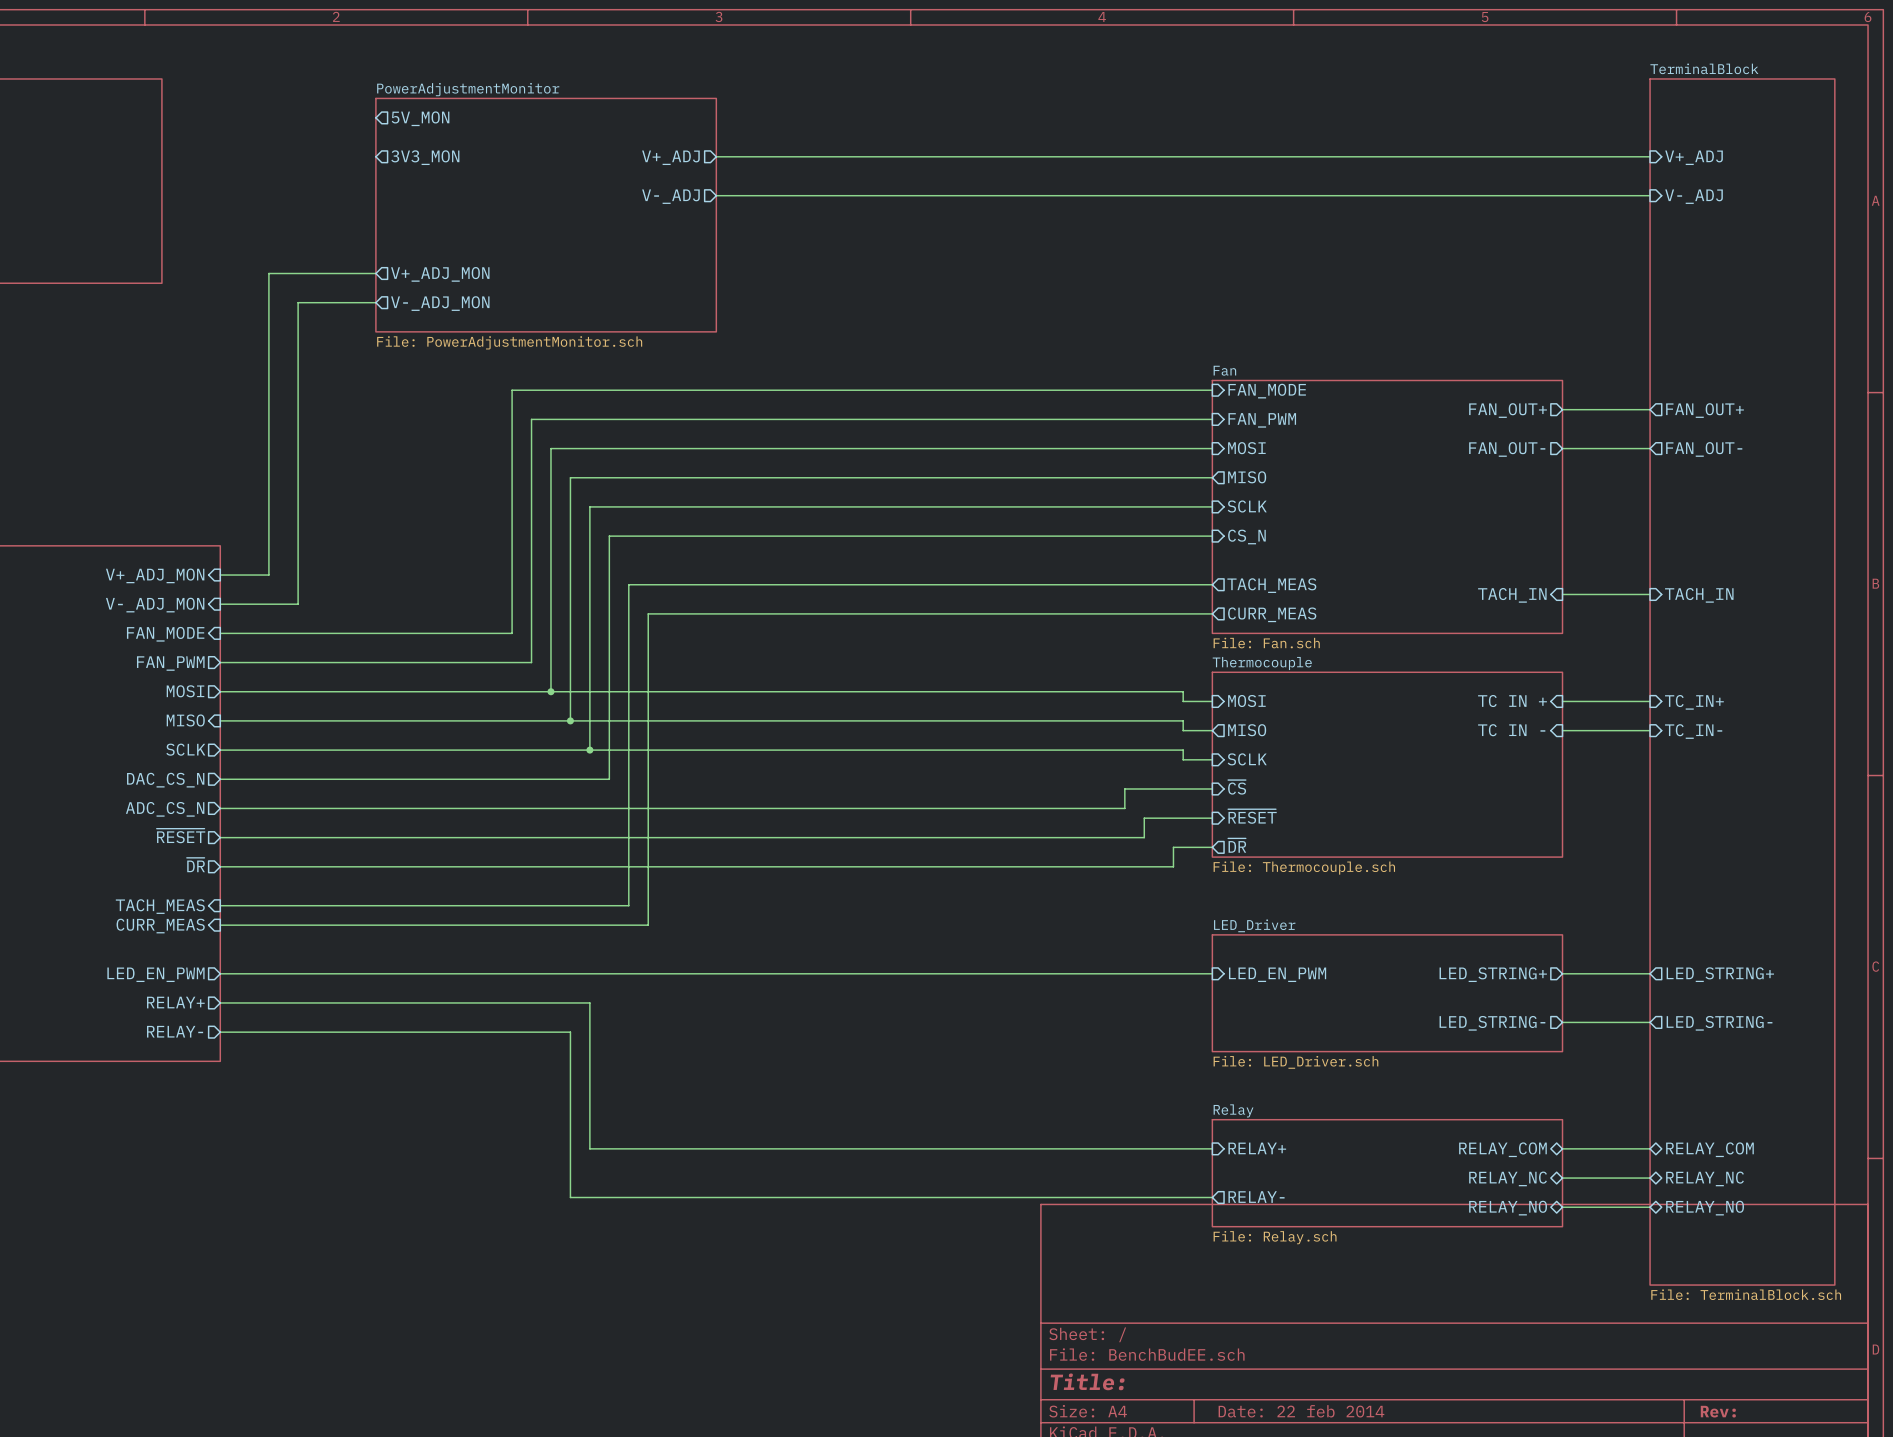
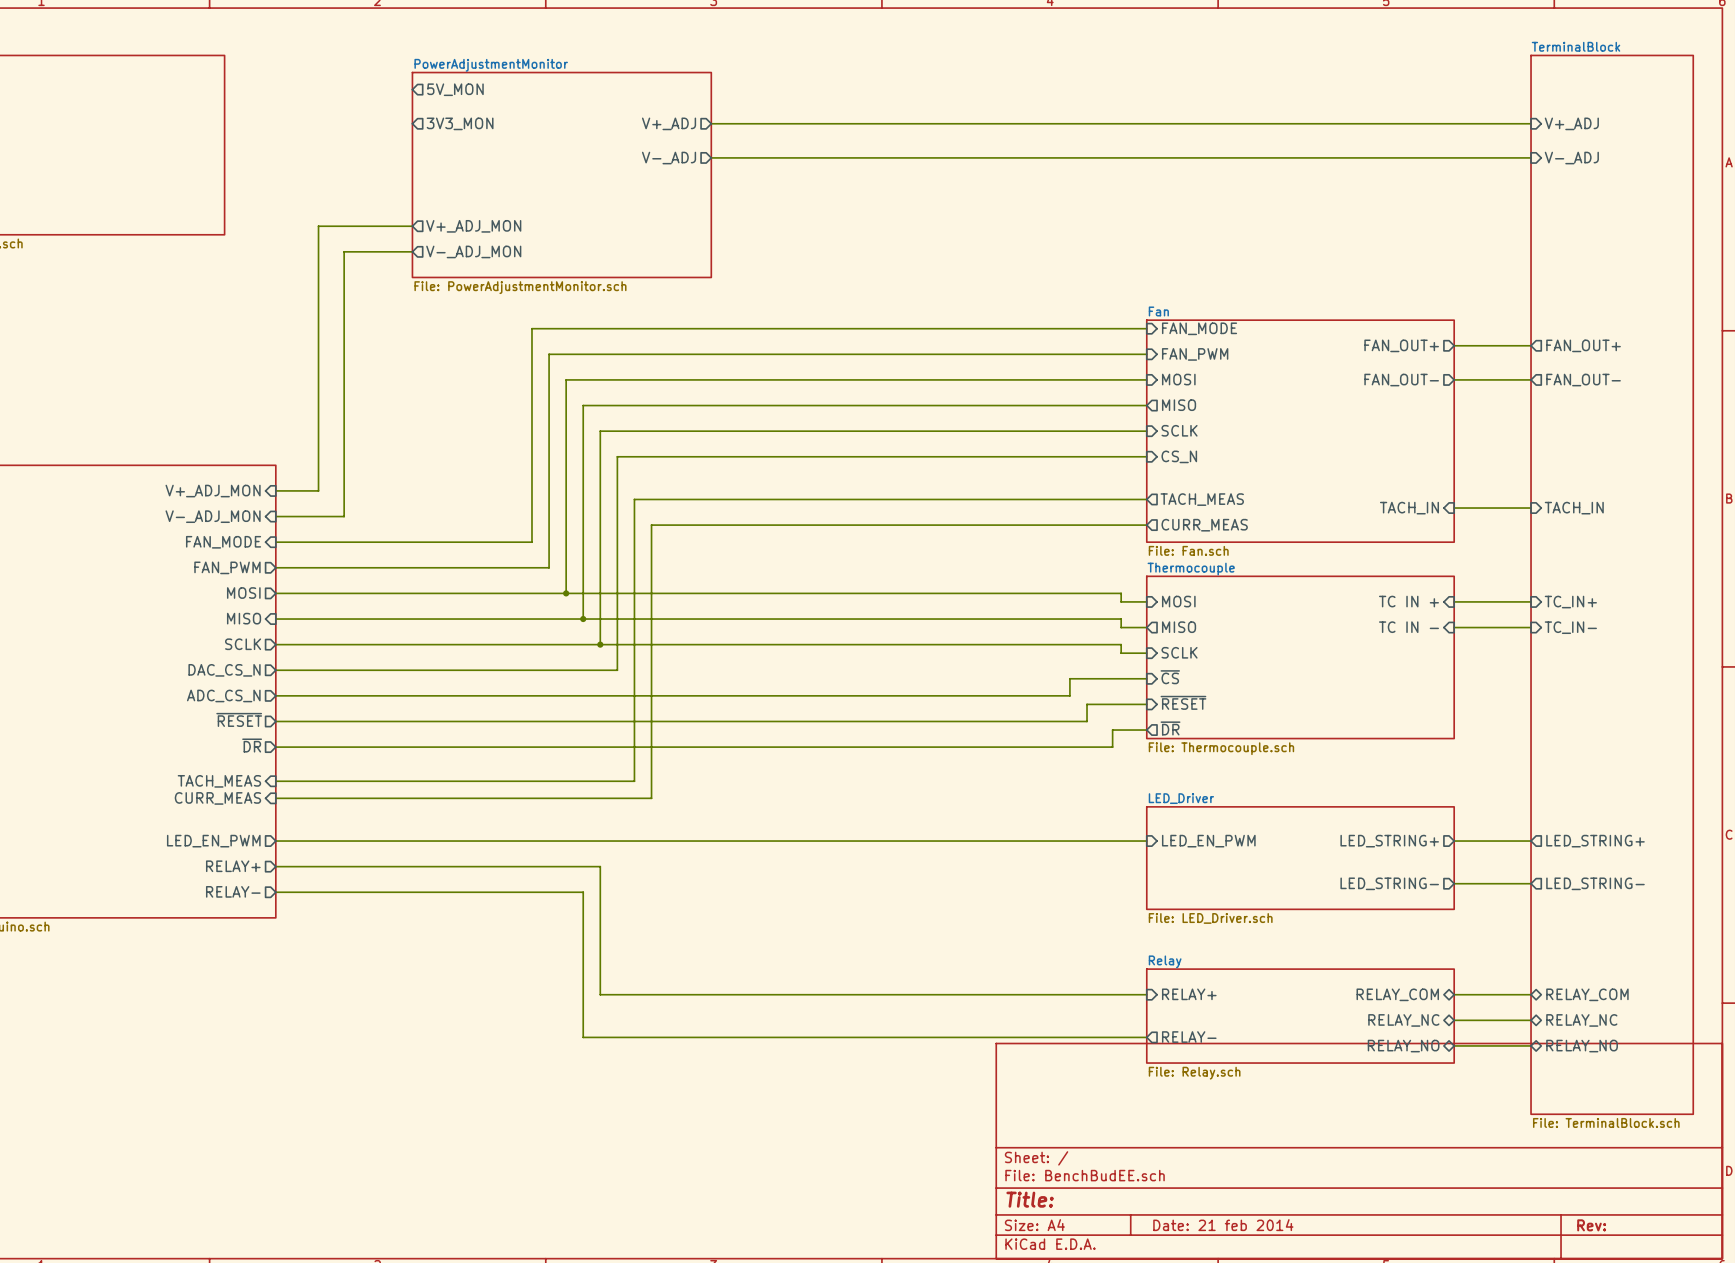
title block: Date: 22 feb 2014 (1301, 1411) -> Date: 21 feb 2014 (1223, 1225)

